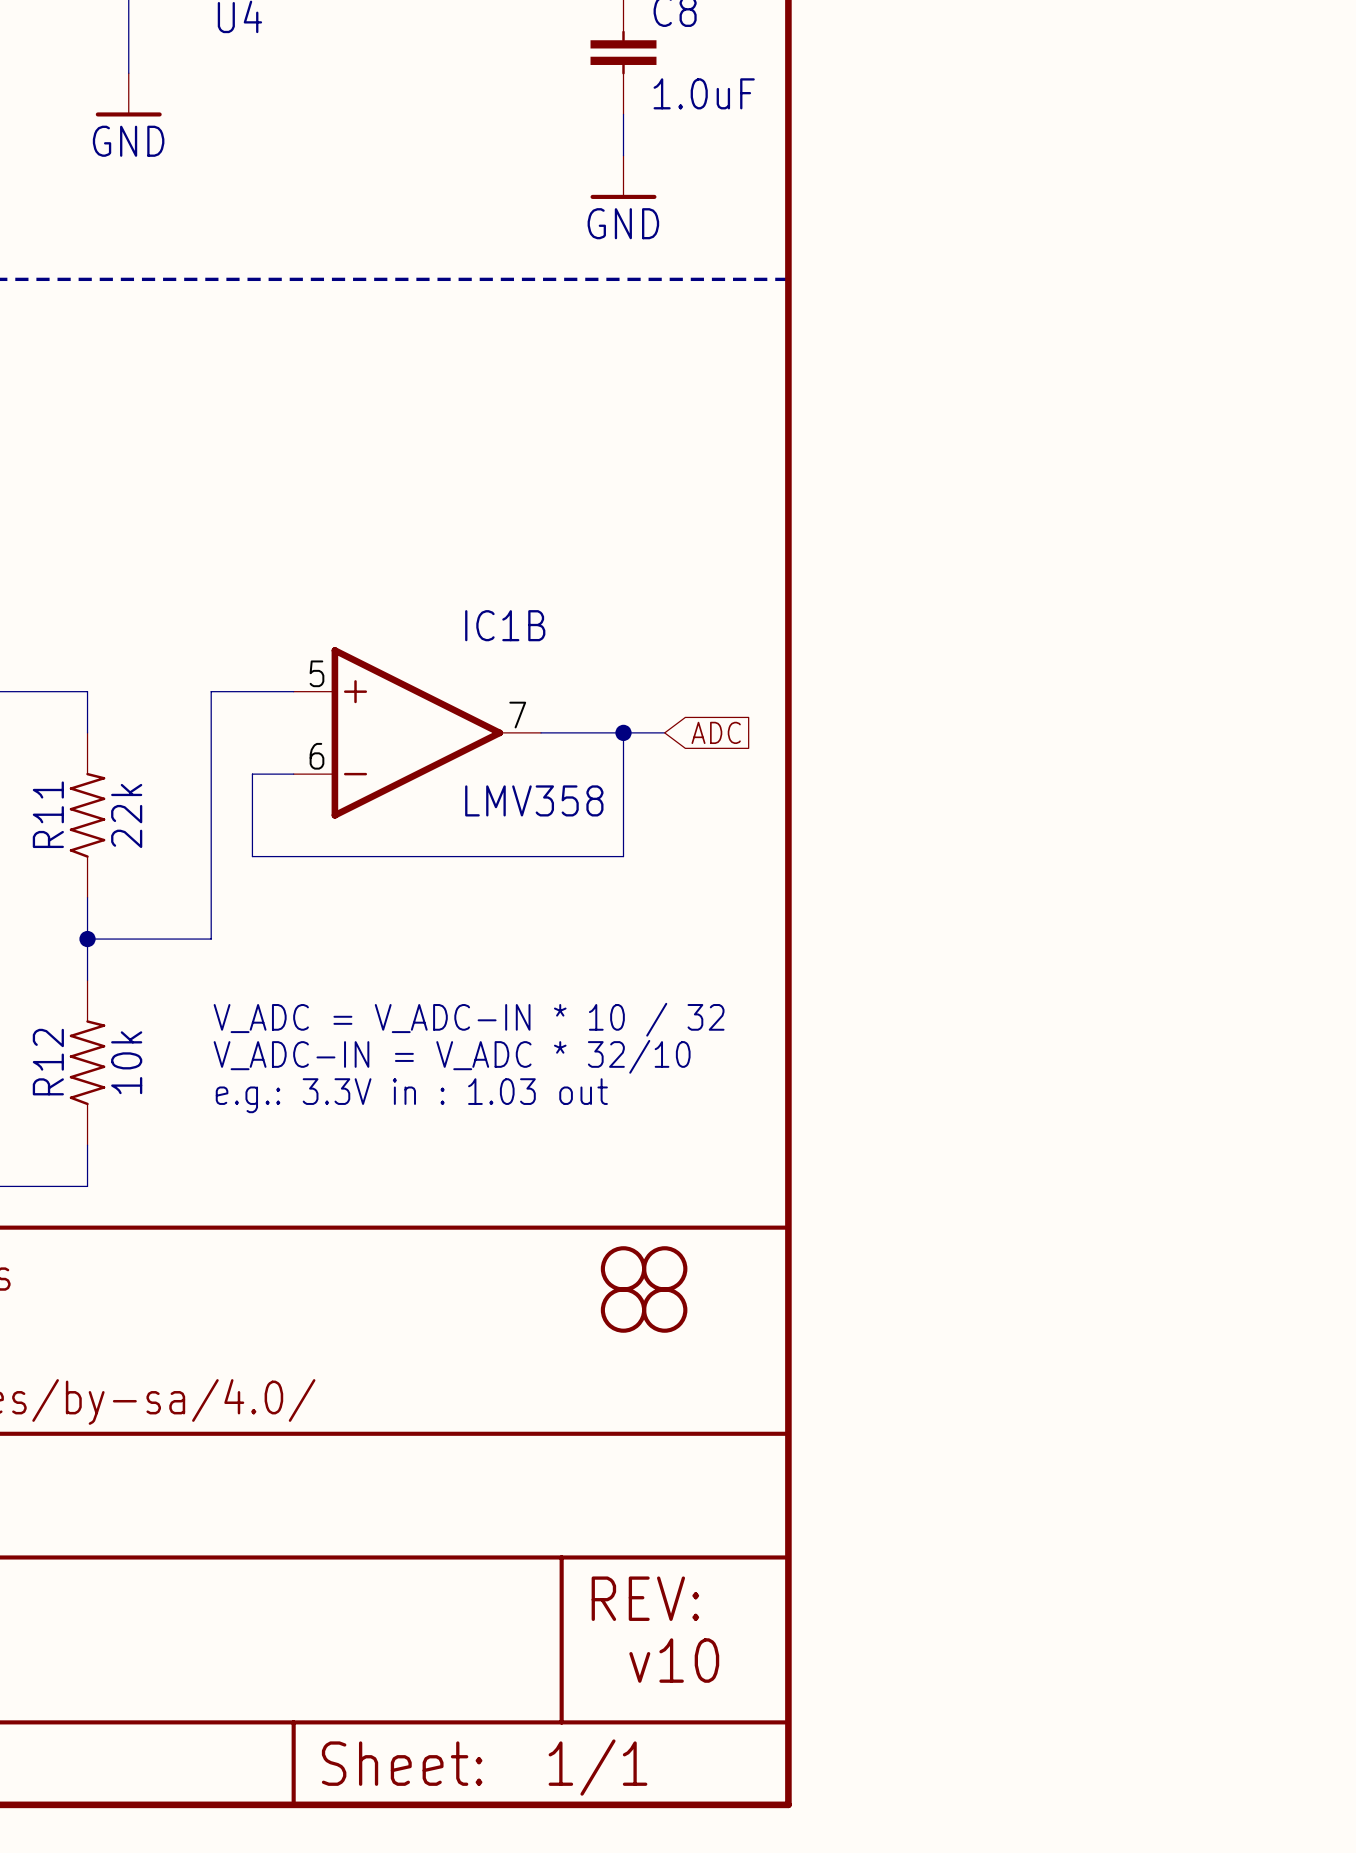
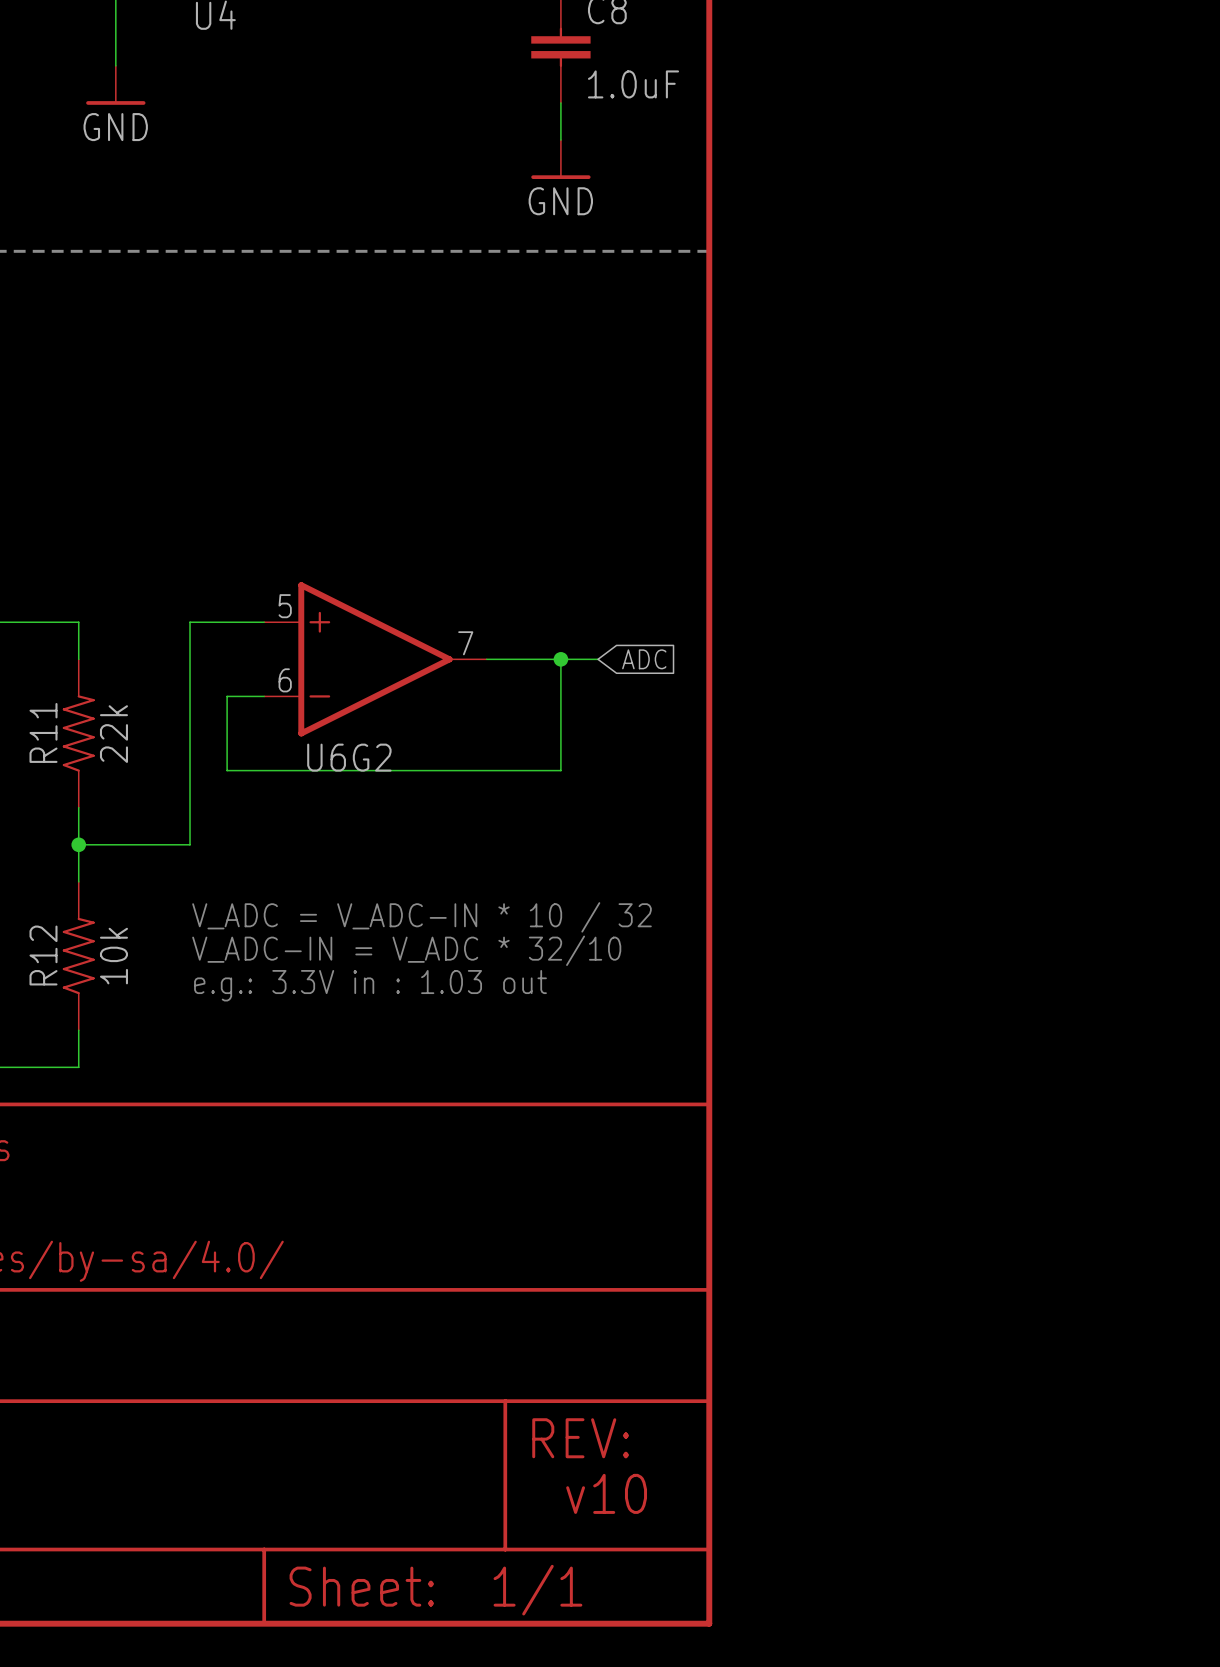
IC1B name: IC1B (505, 625) -> U6G2 (349, 757)
IC1B value: LMV358 (534, 800) -> none
part: (623, 1268) -> none
part: (664, 1268) -> none
part: (623, 1310) -> none
part: (664, 1310) -> none

